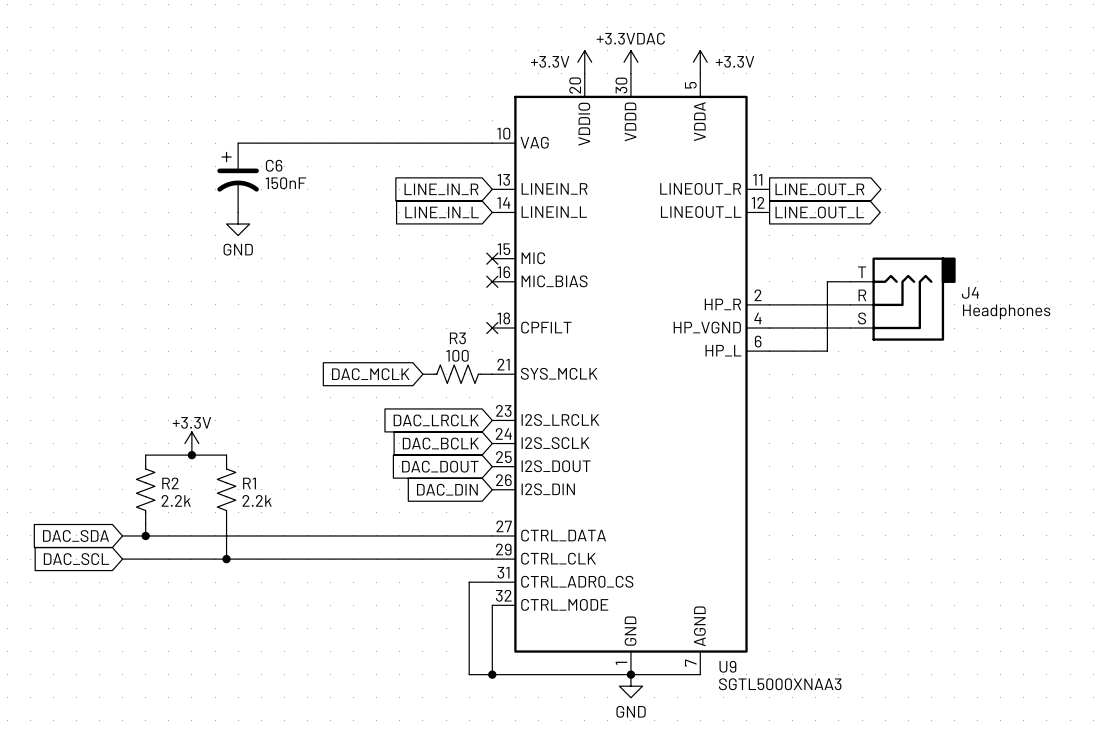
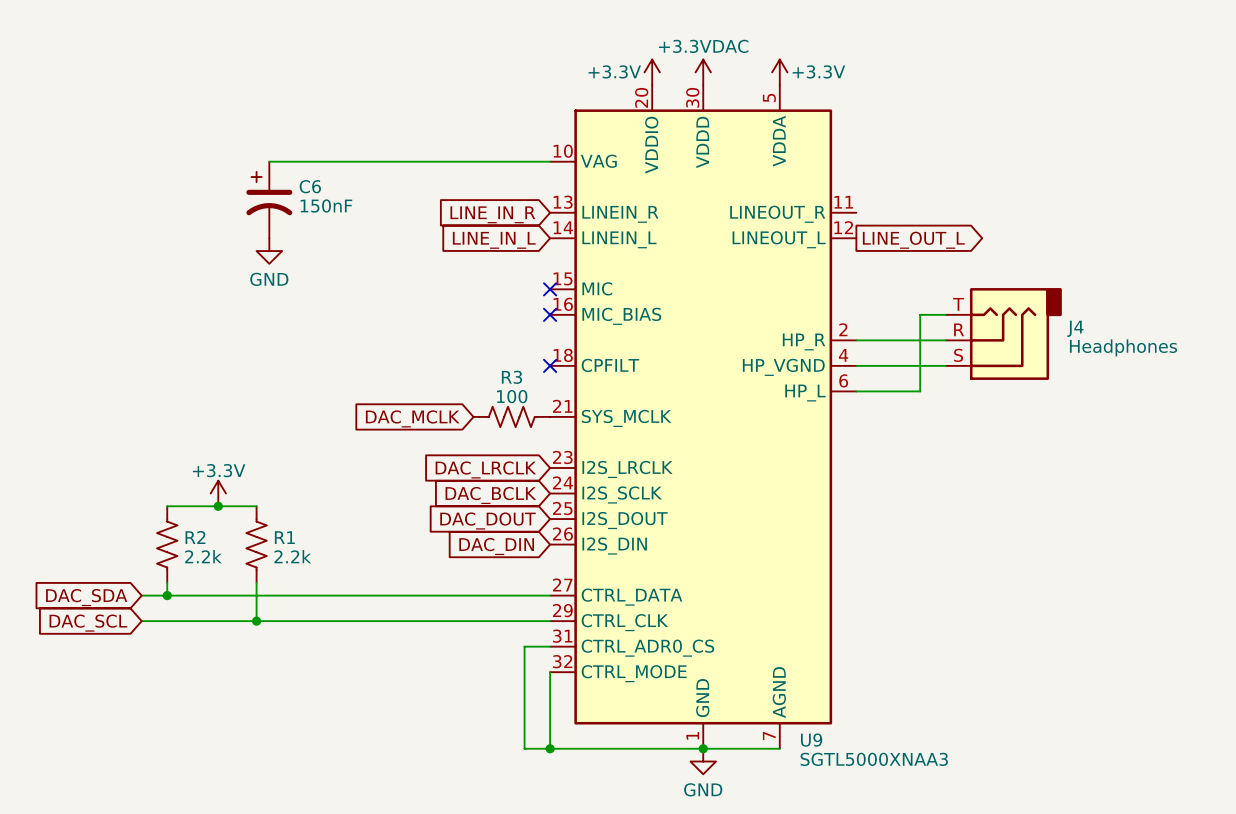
global label: LINE_OUT_R (819, 189) -> none

